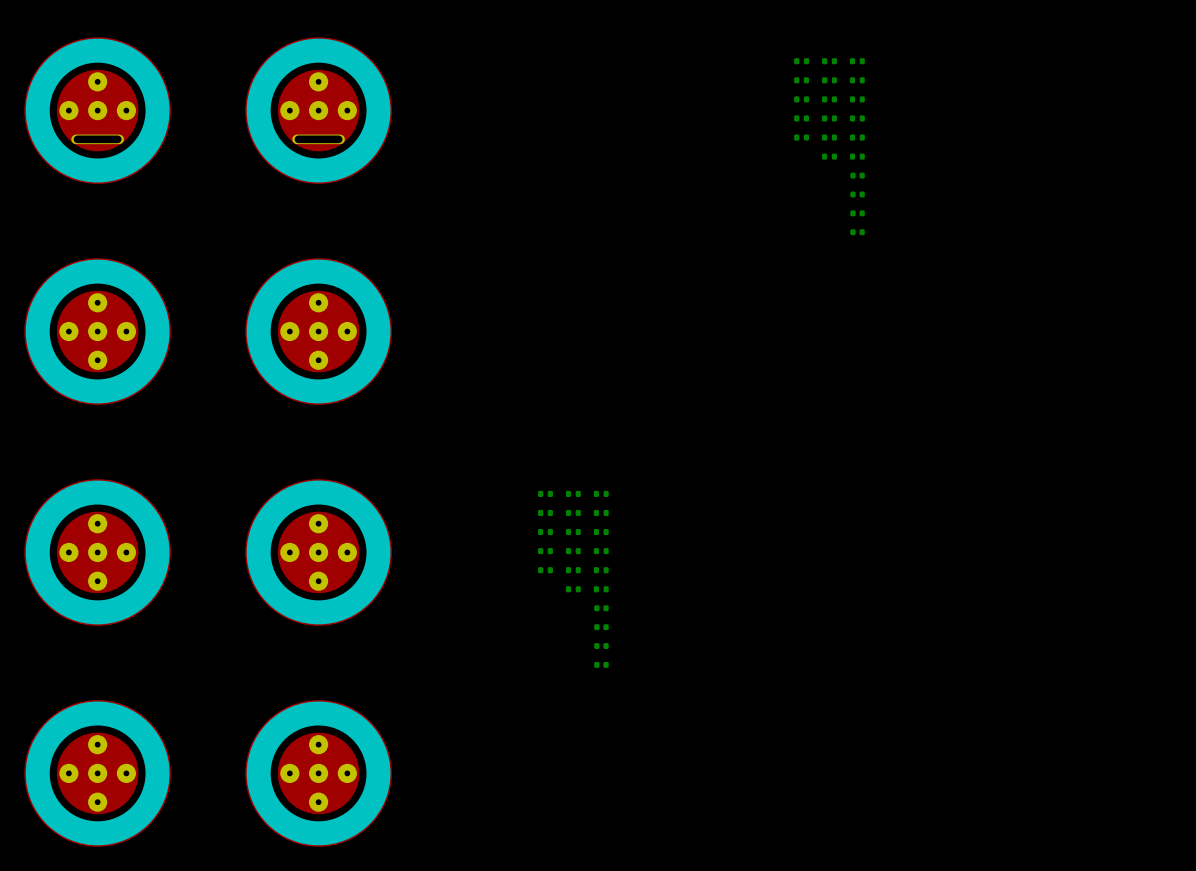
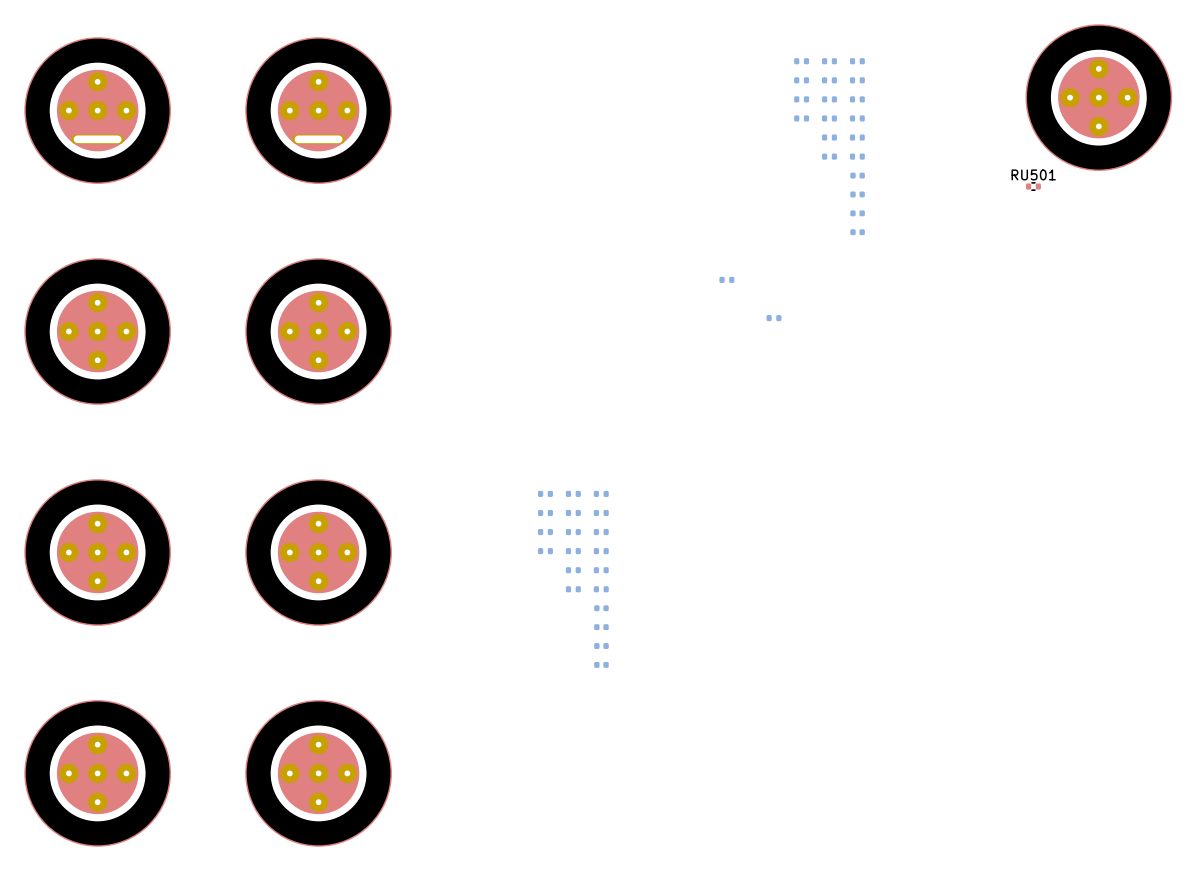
part: none -> (1098, 97)
part: (801, 137) -> none
RU501: none -> (1033, 186)
part: none -> (726, 279)
part: none -> (773, 318)
part: (545, 570) -> none

